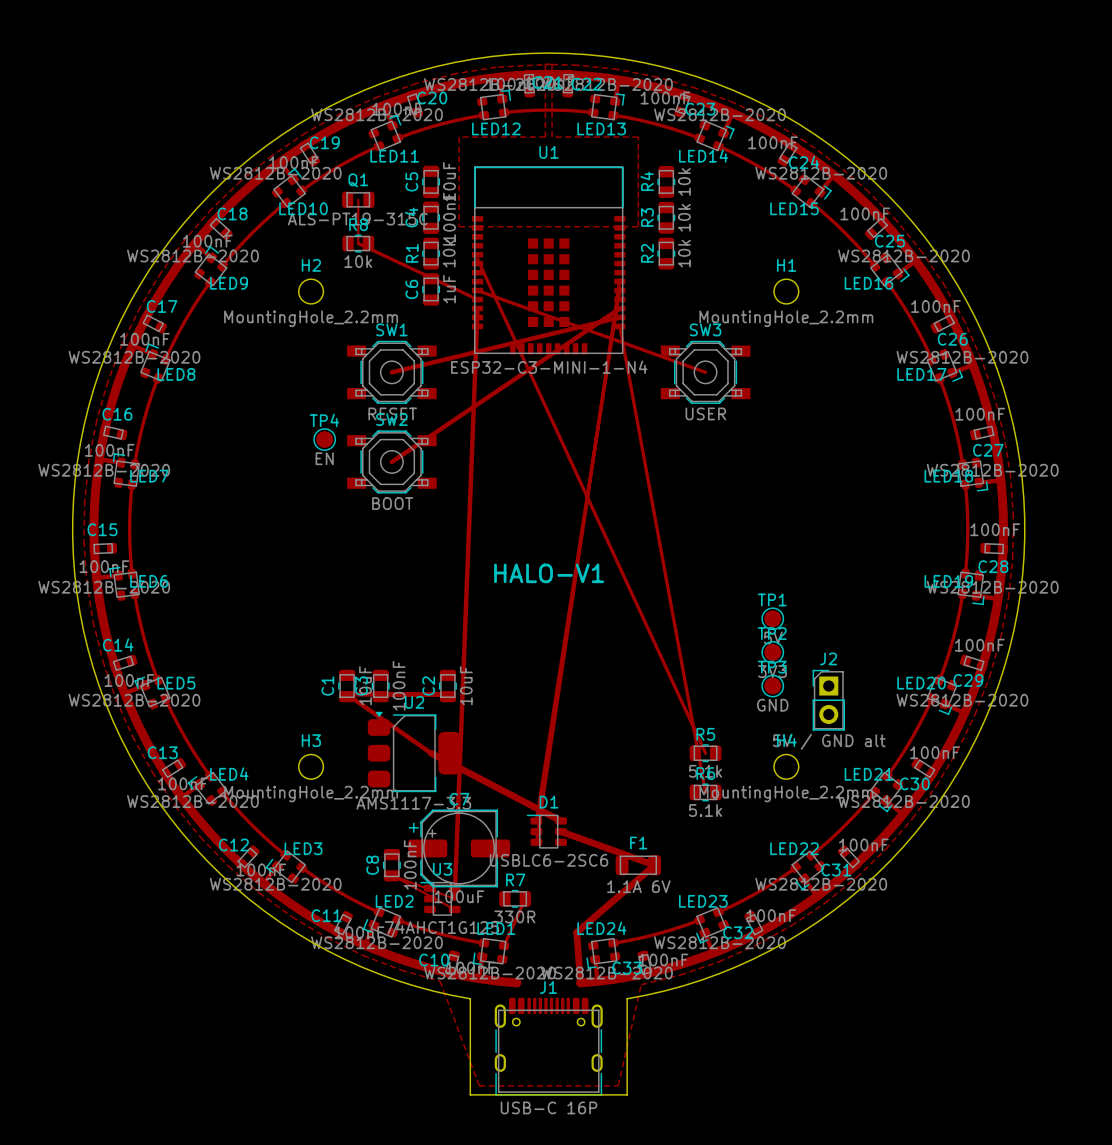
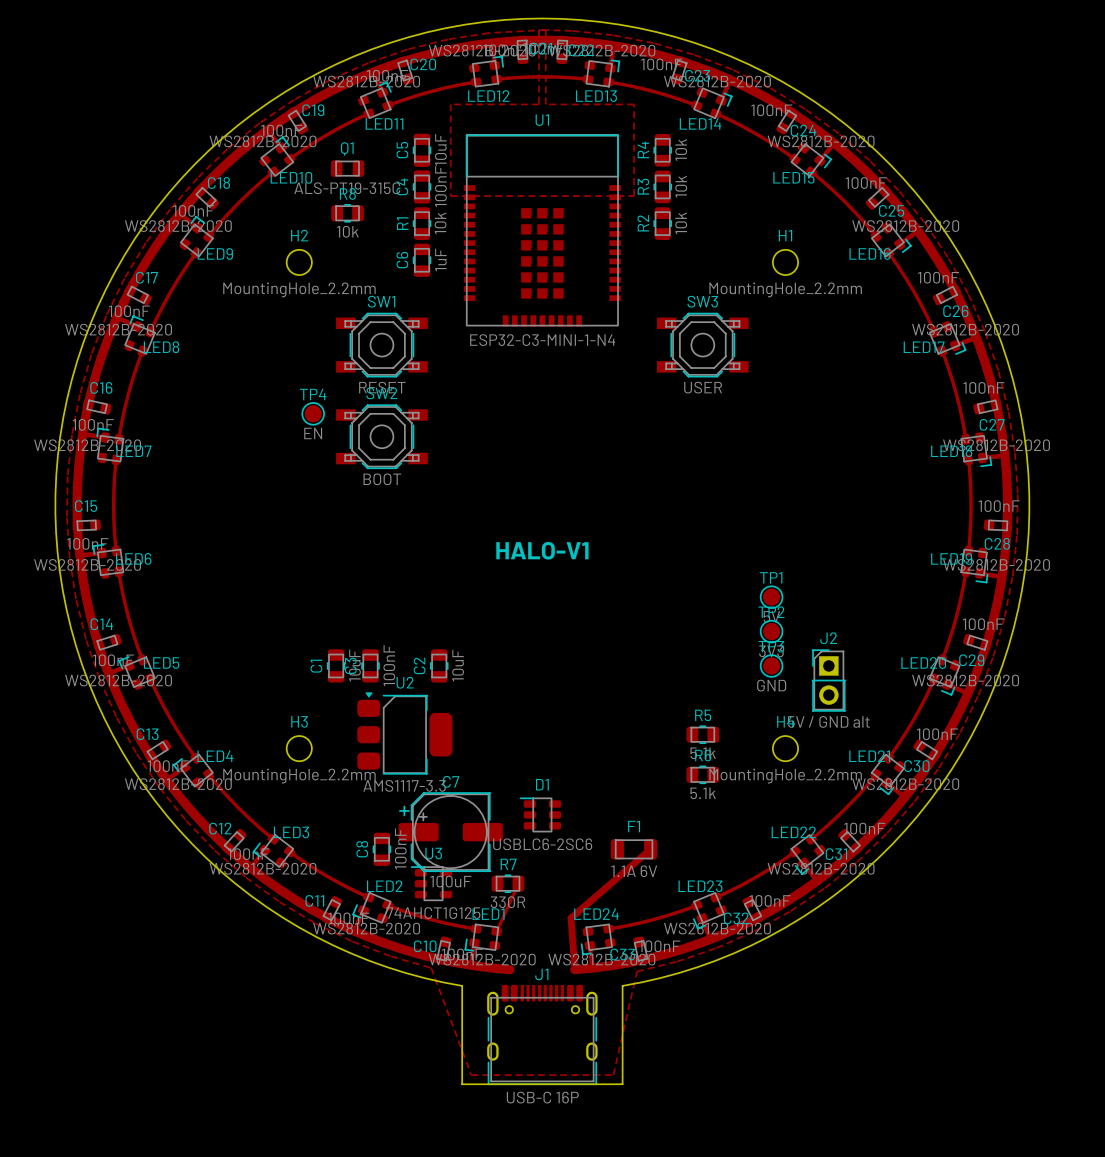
track: (358, 199) (358, 243) (477, 299) -> none
track: (477, 259) (705, 753) -> none
track: (619, 279) (536, 842) -> none
track: (619, 288) (536, 821) -> none
track: (477, 290) (705, 372) -> none
track: (477, 308) (454, 898) (391, 875) (454, 909) -> none
track: (619, 308) (391, 461) -> none
track: (619, 317) (391, 372) -> none
track: (619, 326) (705, 792) -> none
track: (447, 694) (347, 694) (431, 753) (561, 821) -> none
track: (561, 831) (654, 865) -> none

